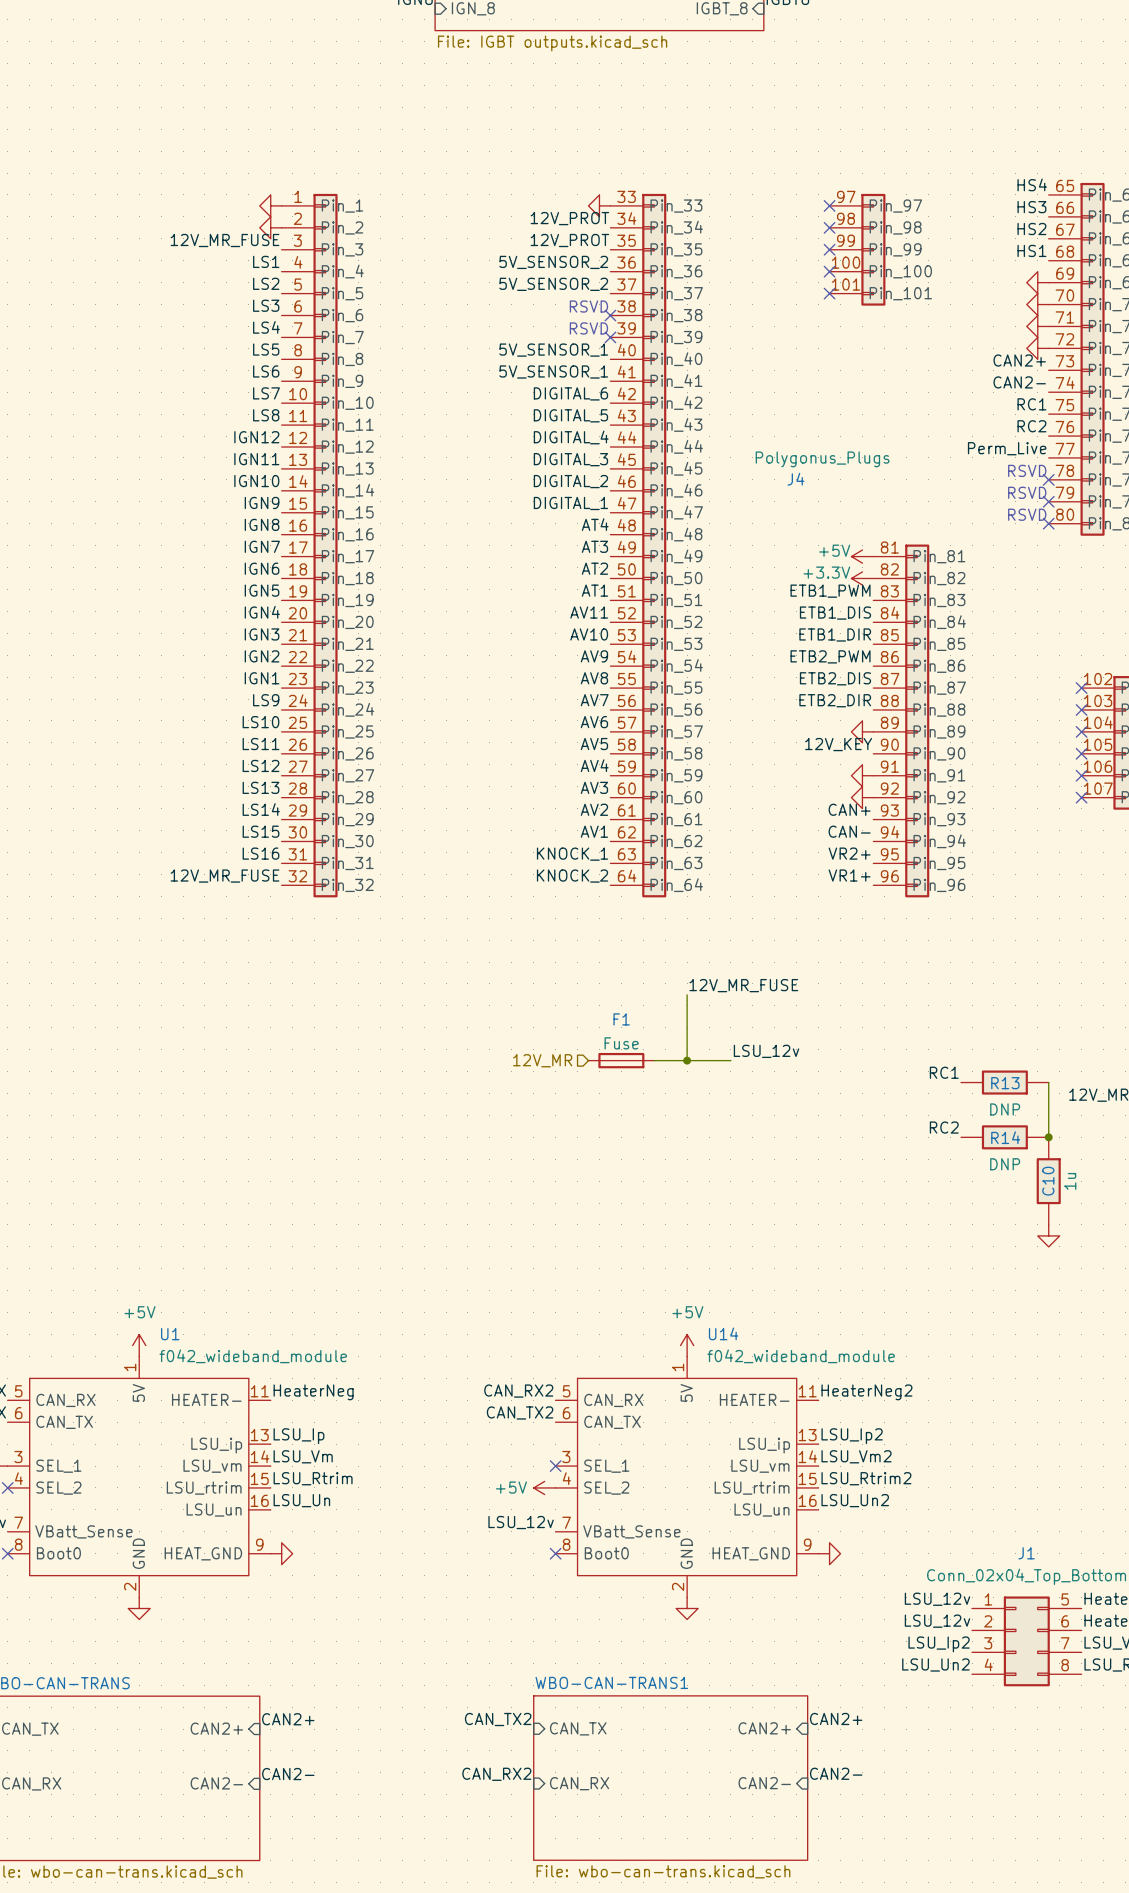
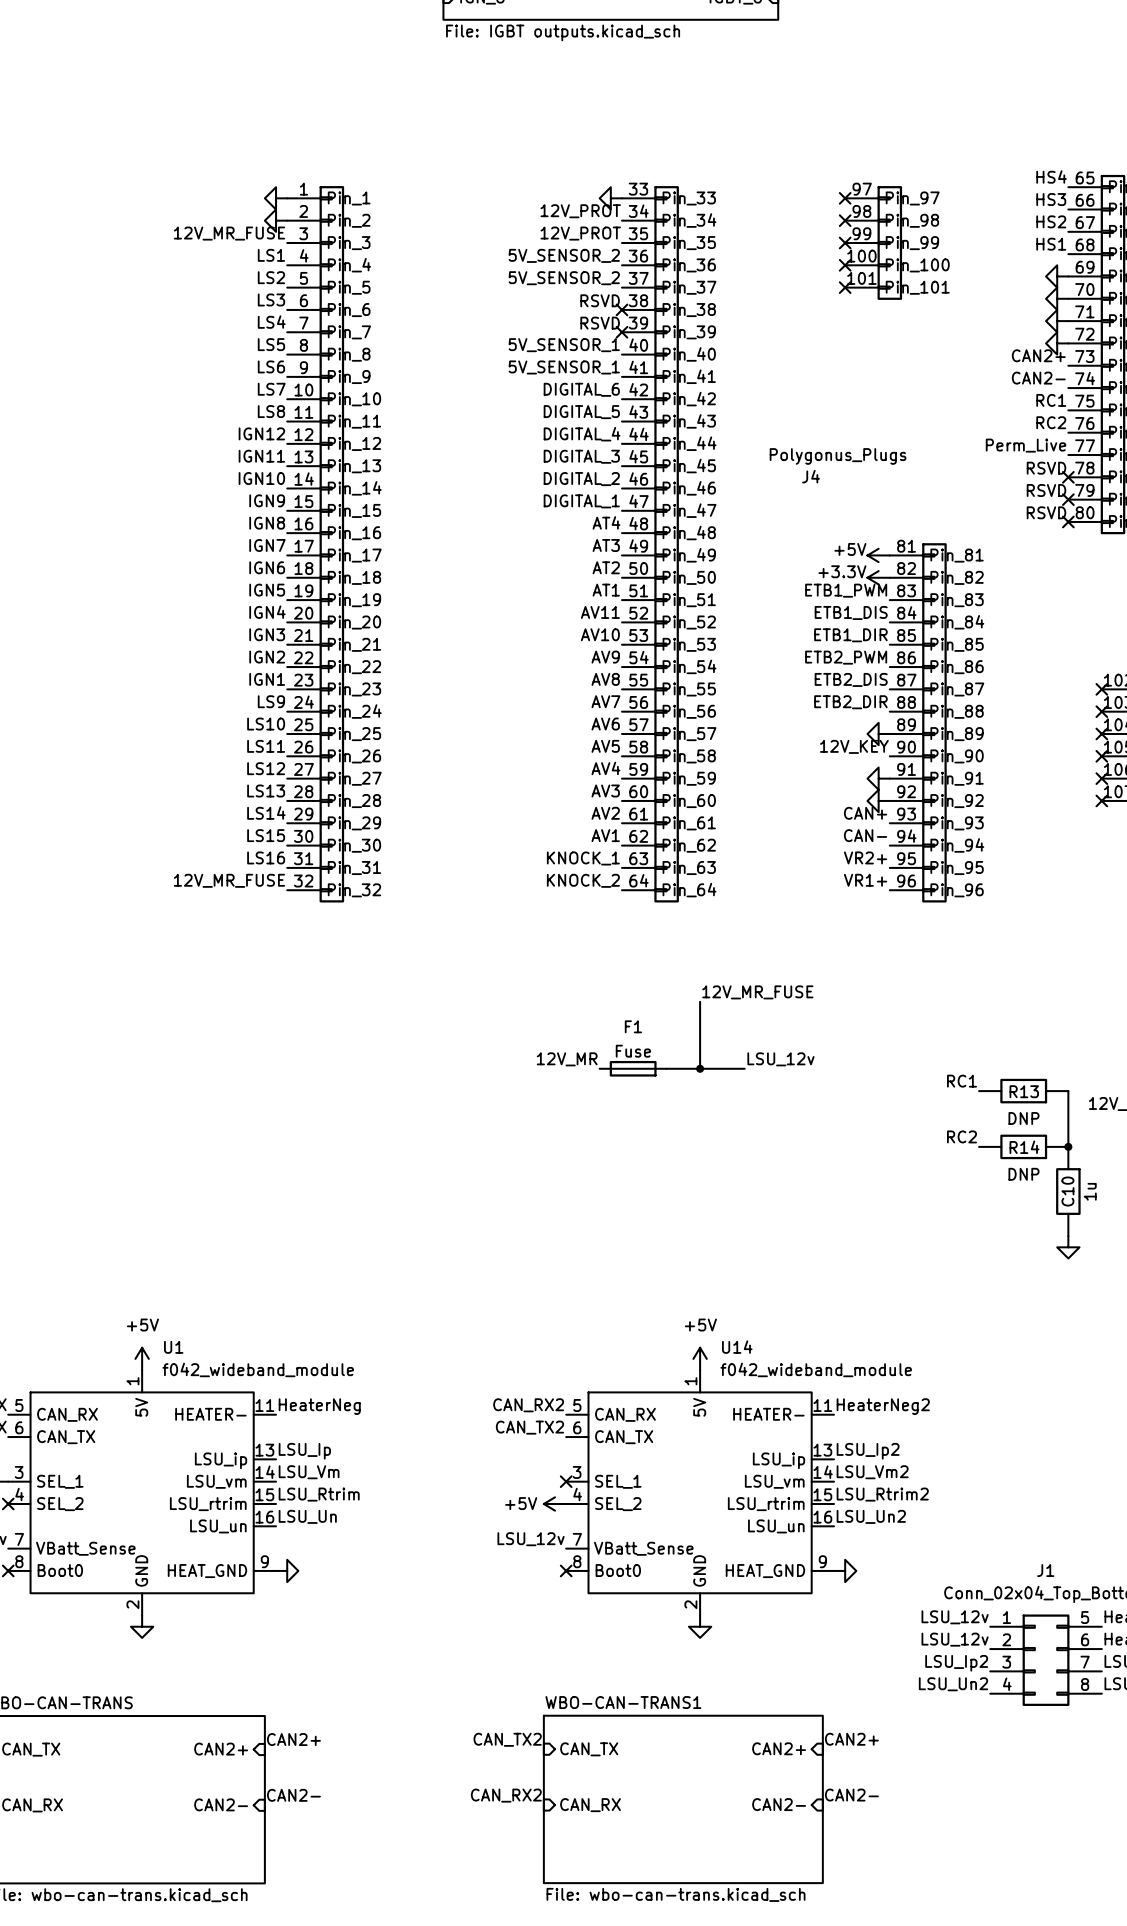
label: none -> 12V_MR (567, 1059)
hierarchical label: 12V_MR (542, 1060) -> none

